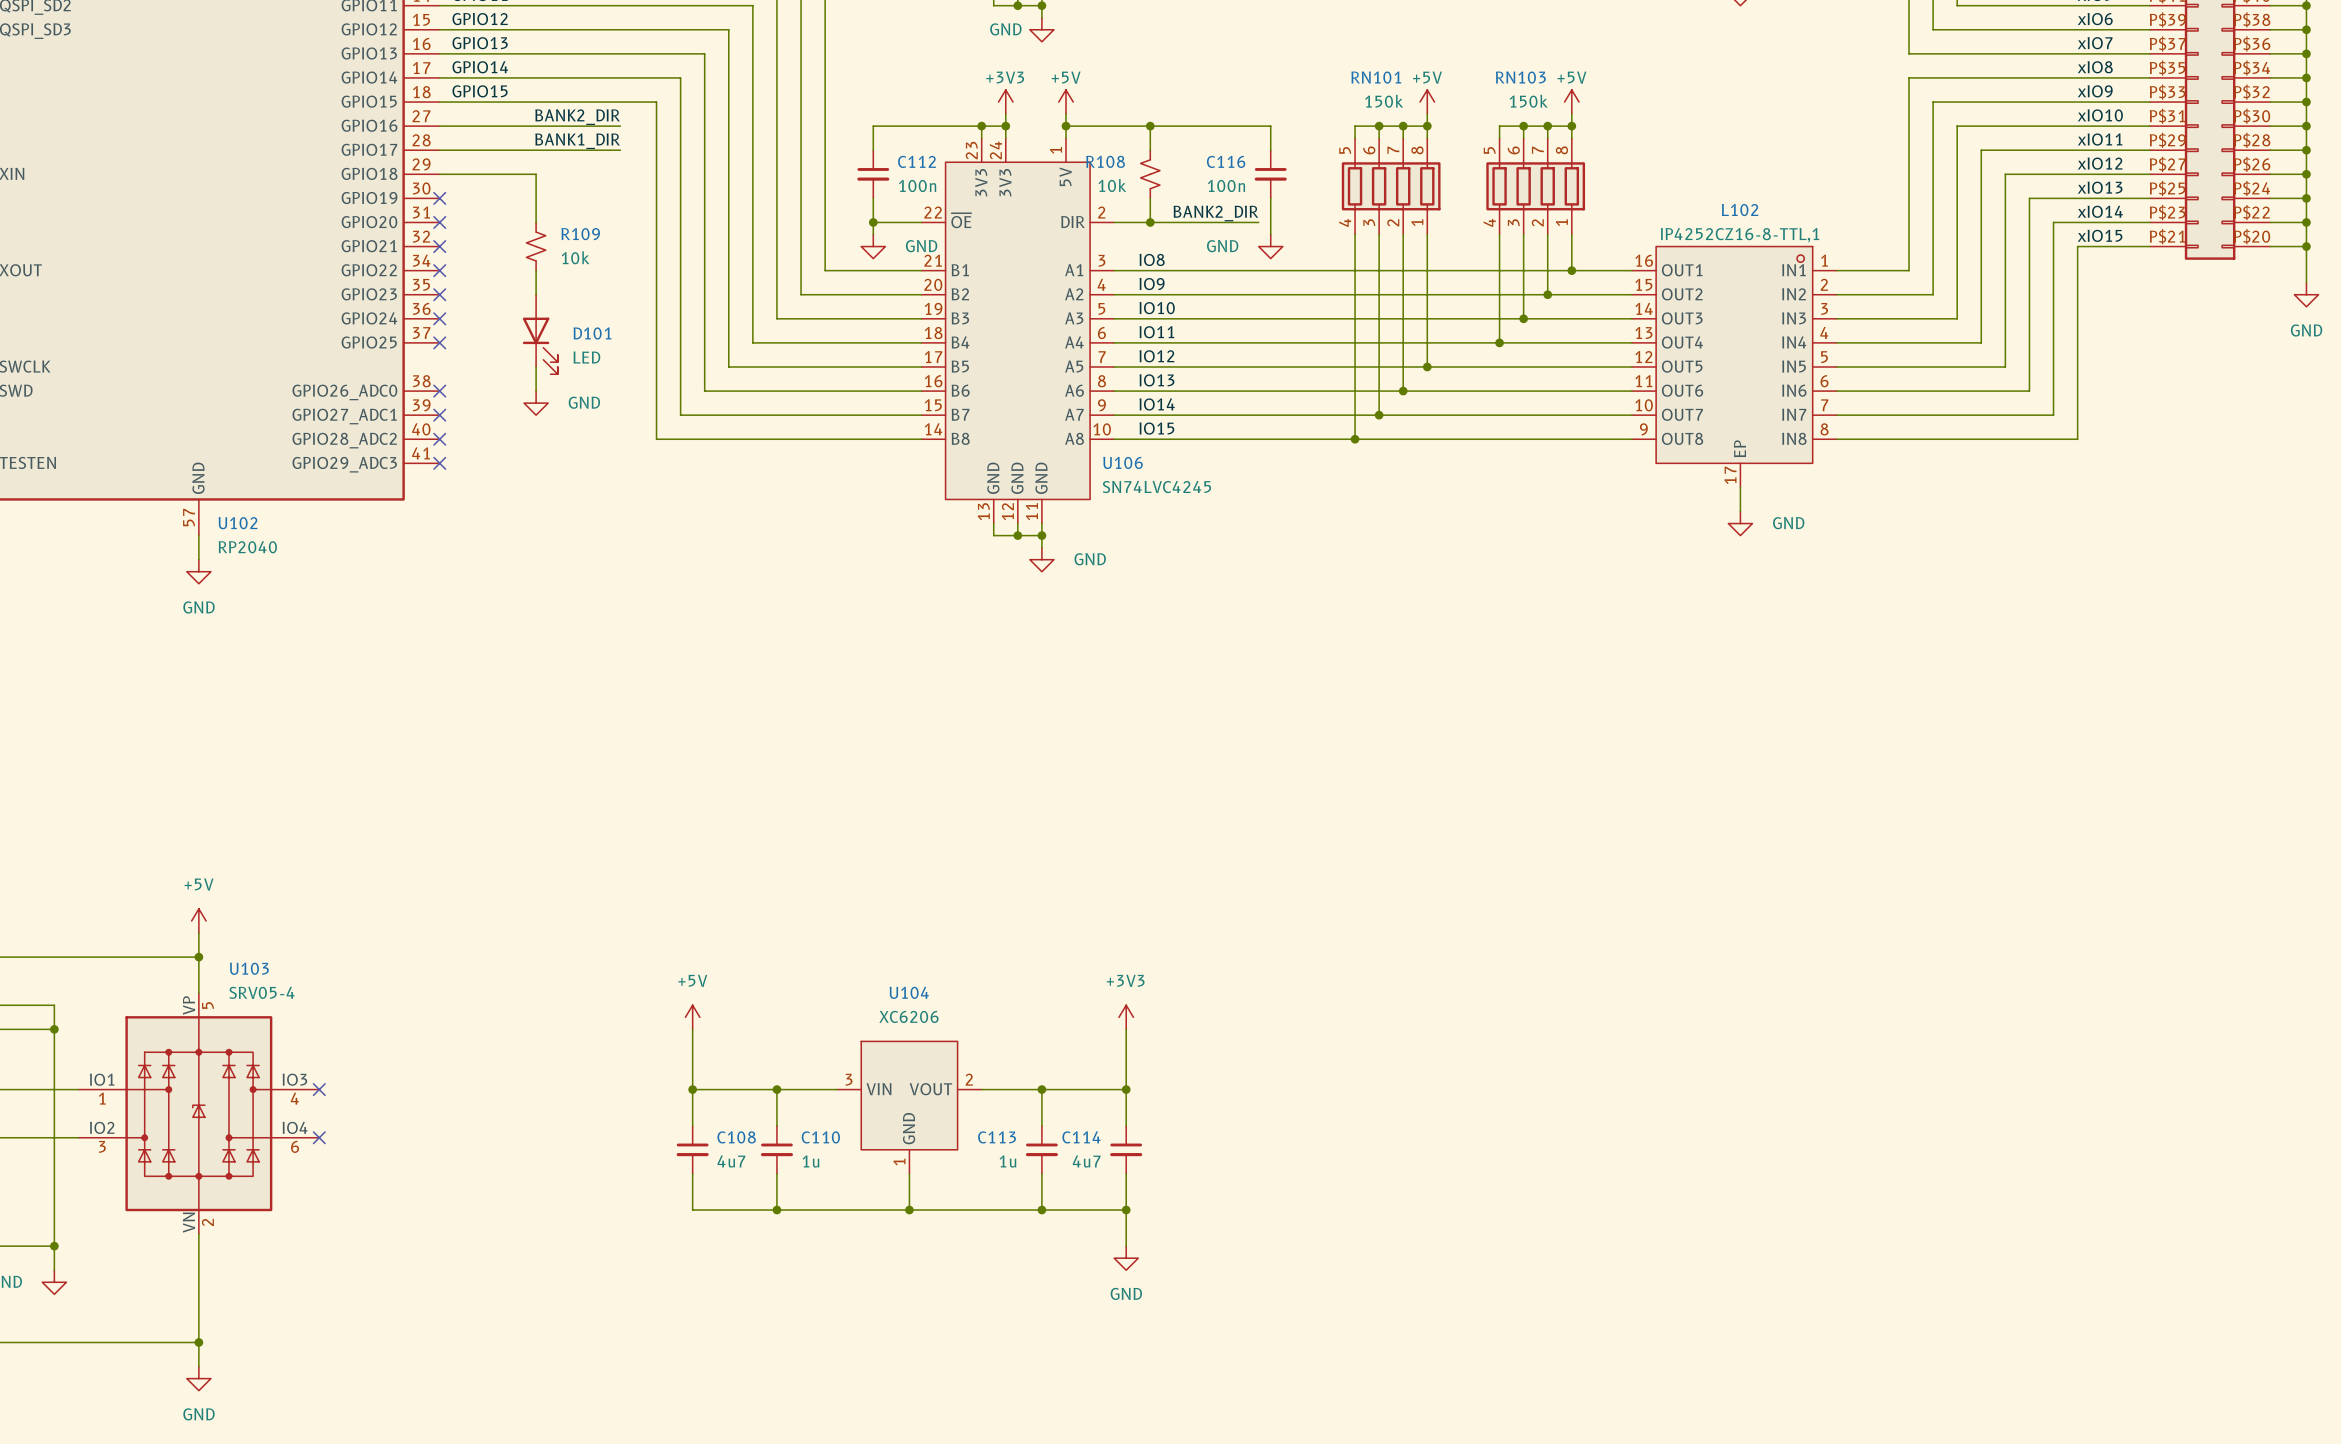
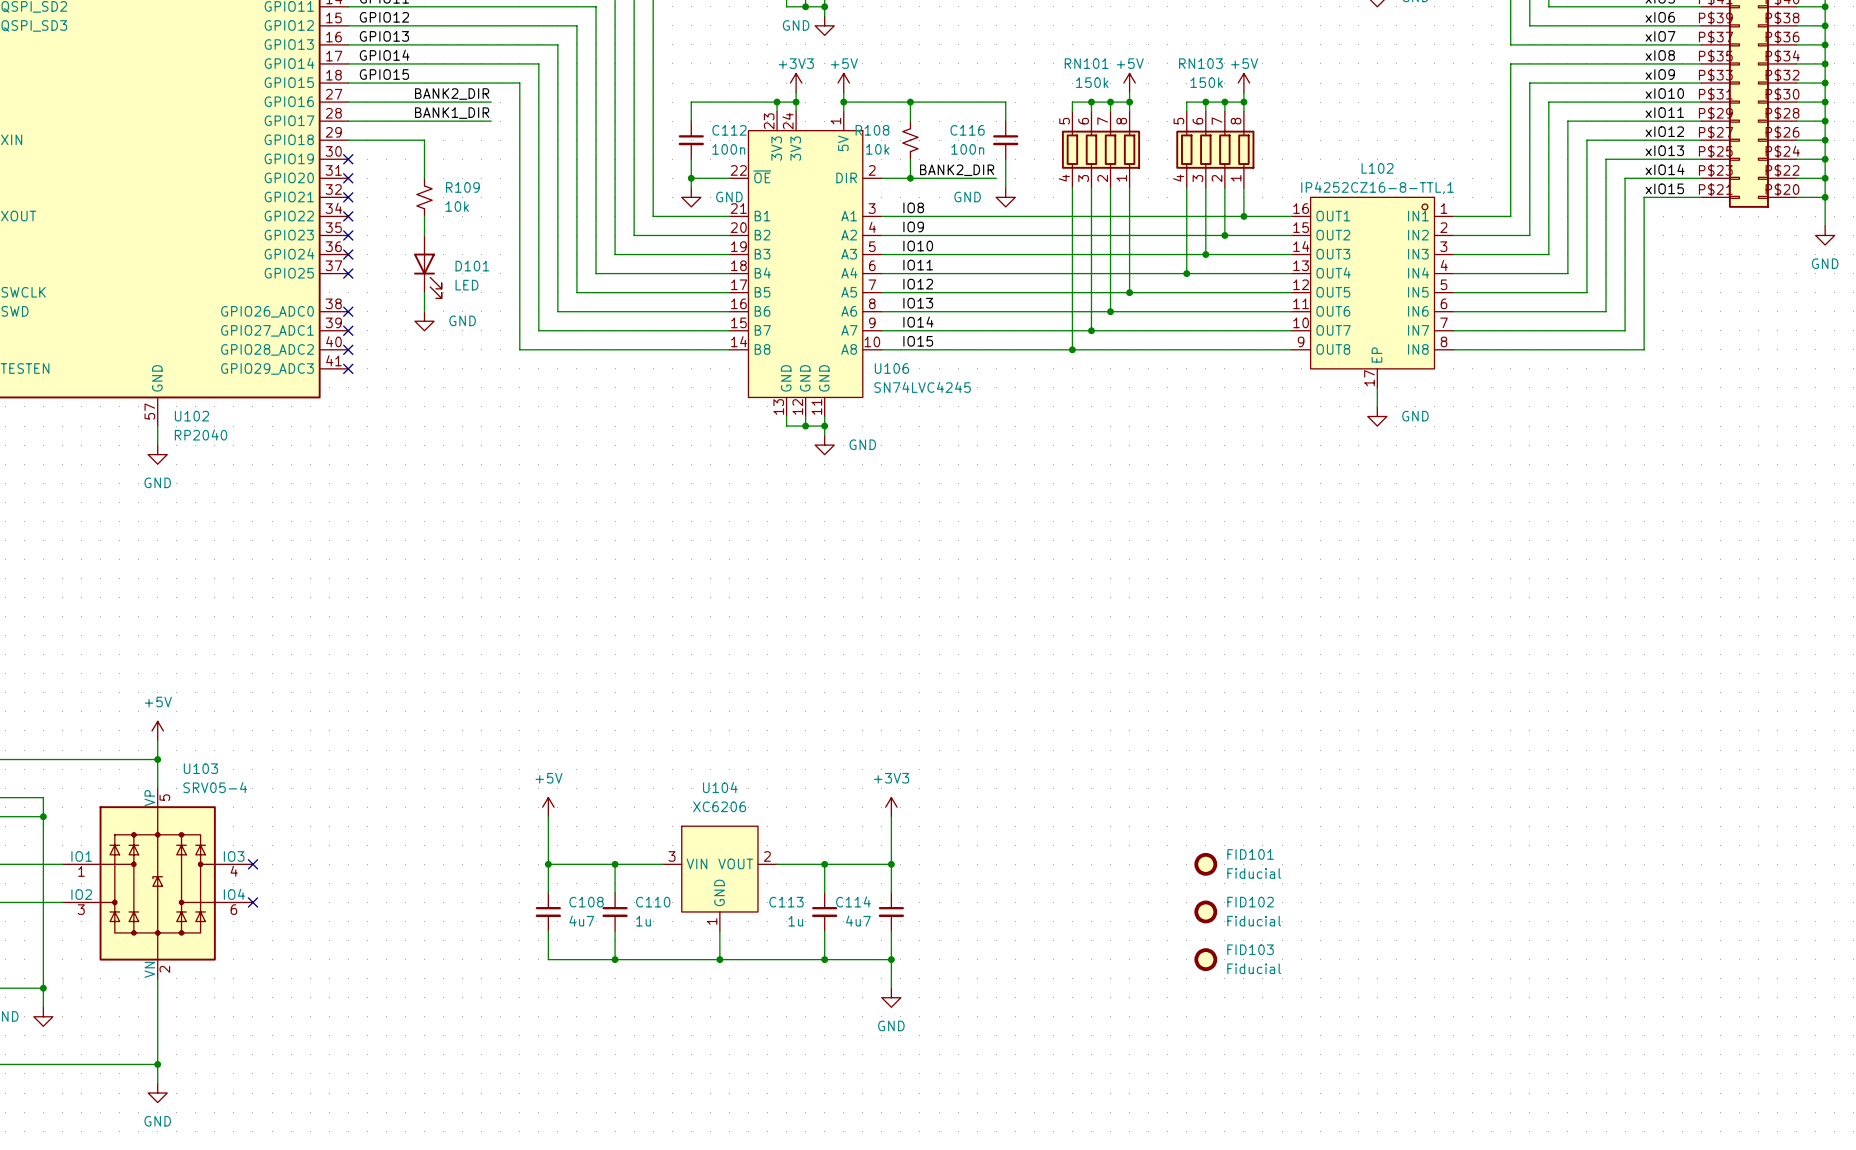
FID101: none -> Fiducial (1205, 864)
FID102: none -> Fiducial (1205, 911)
FID103: none -> Fiducial (1205, 959)

